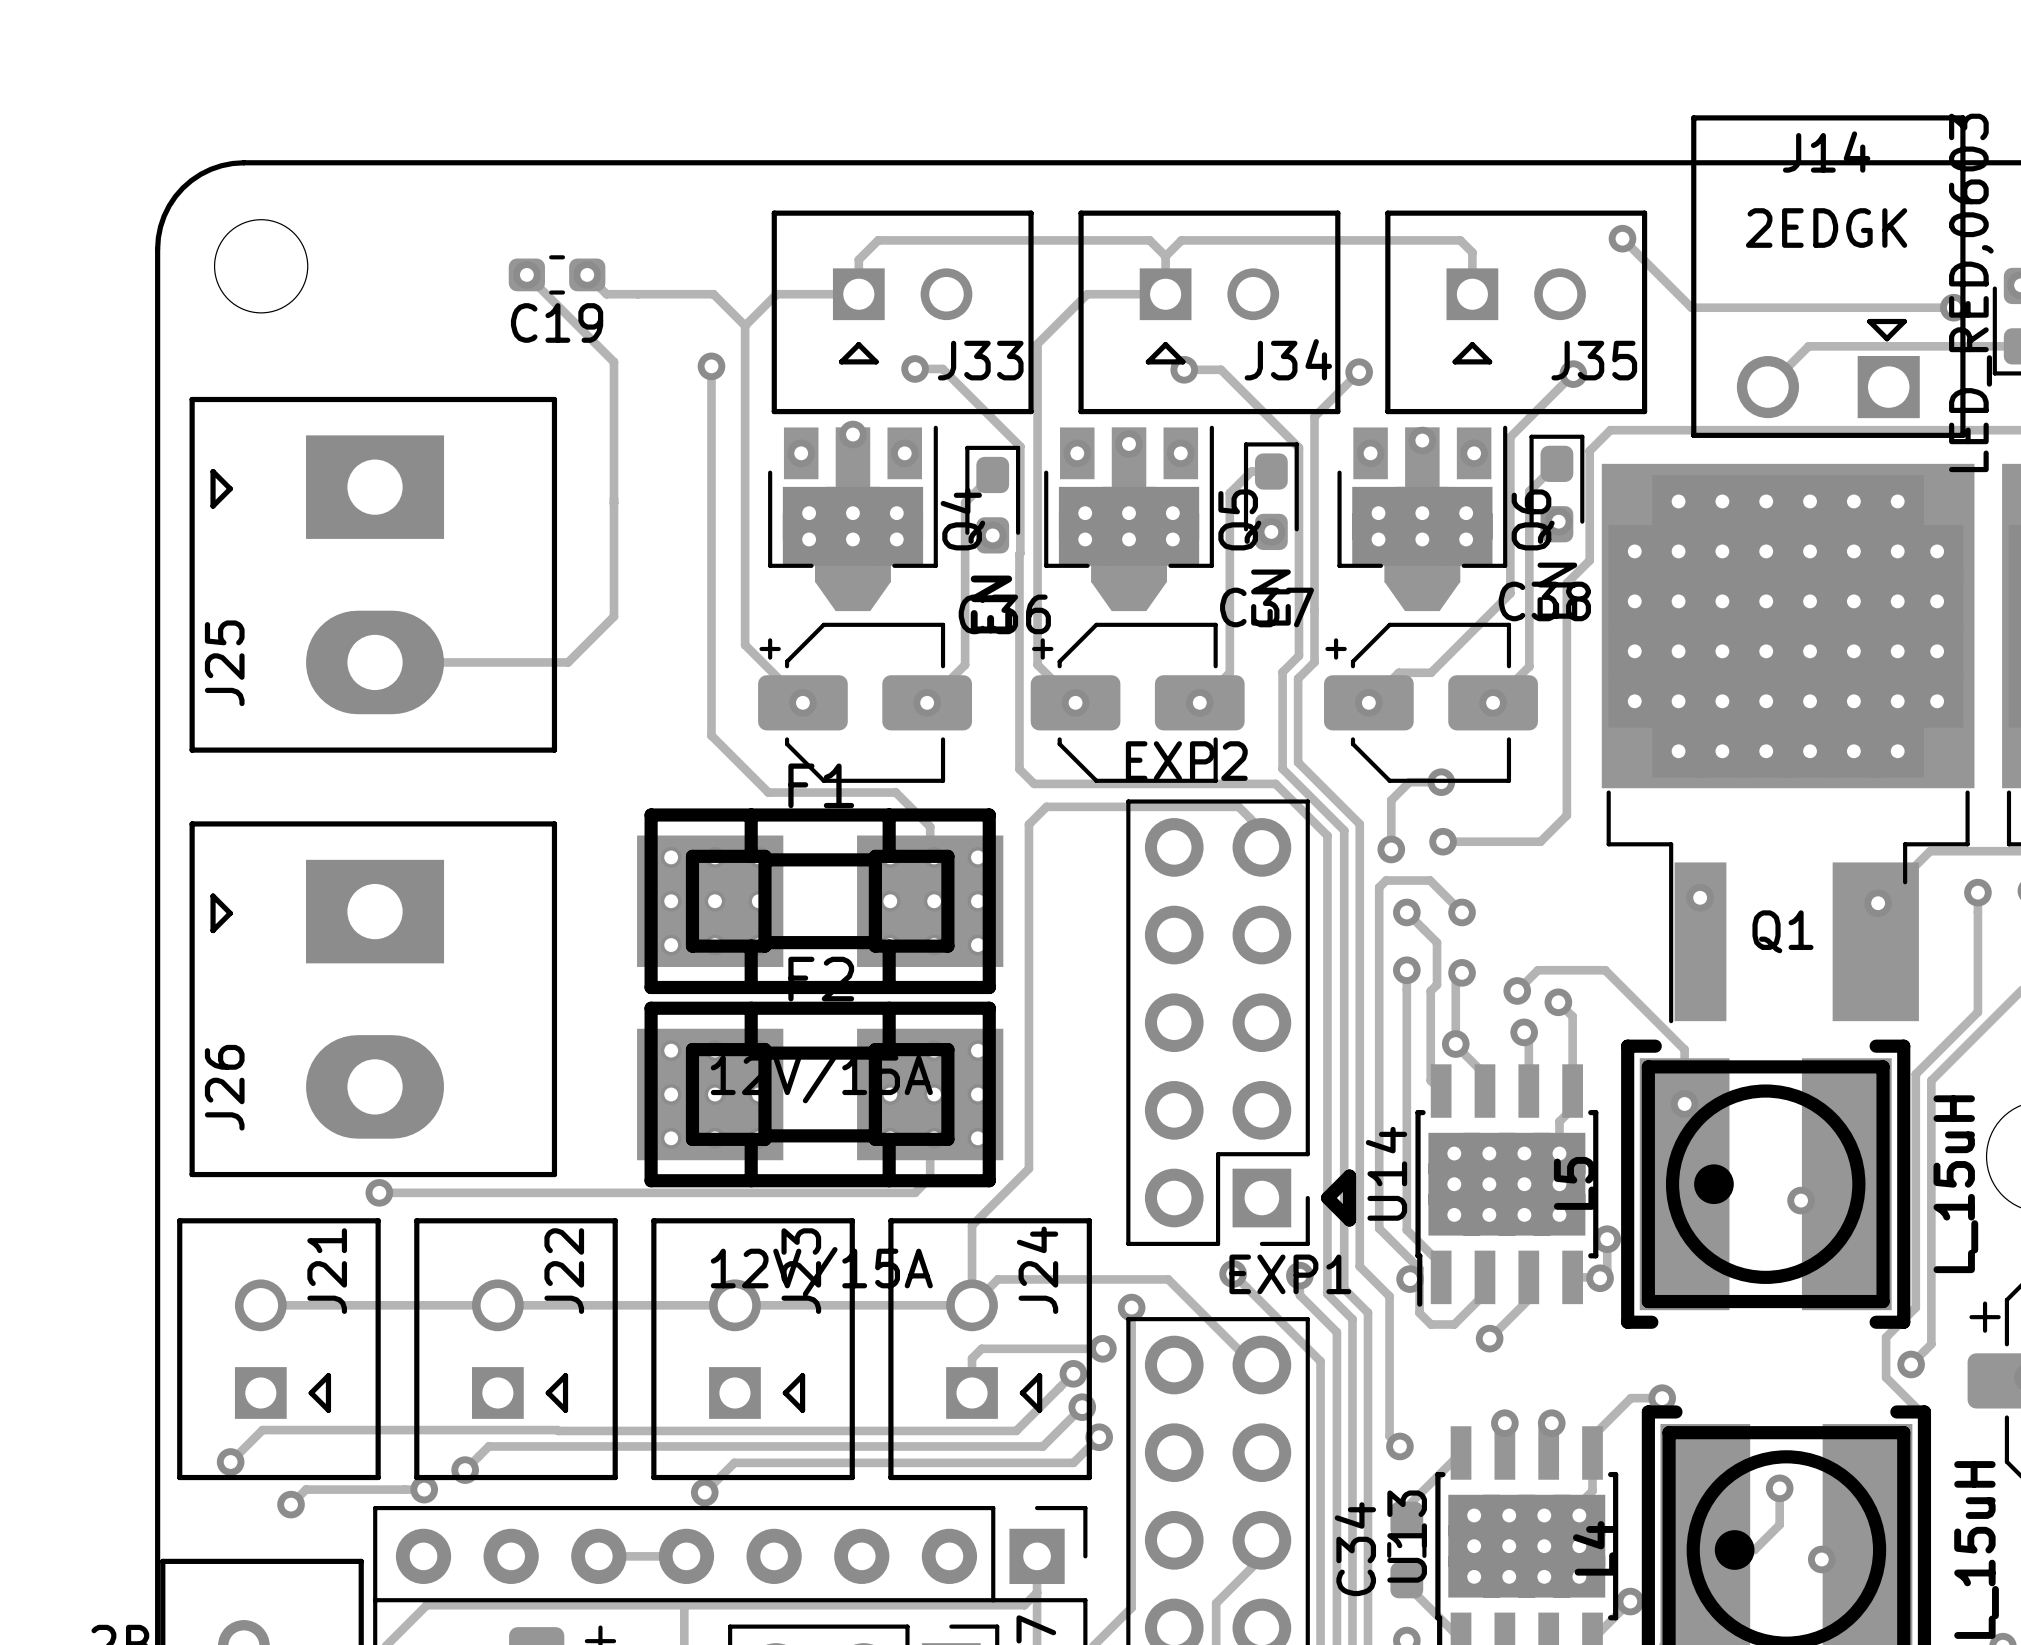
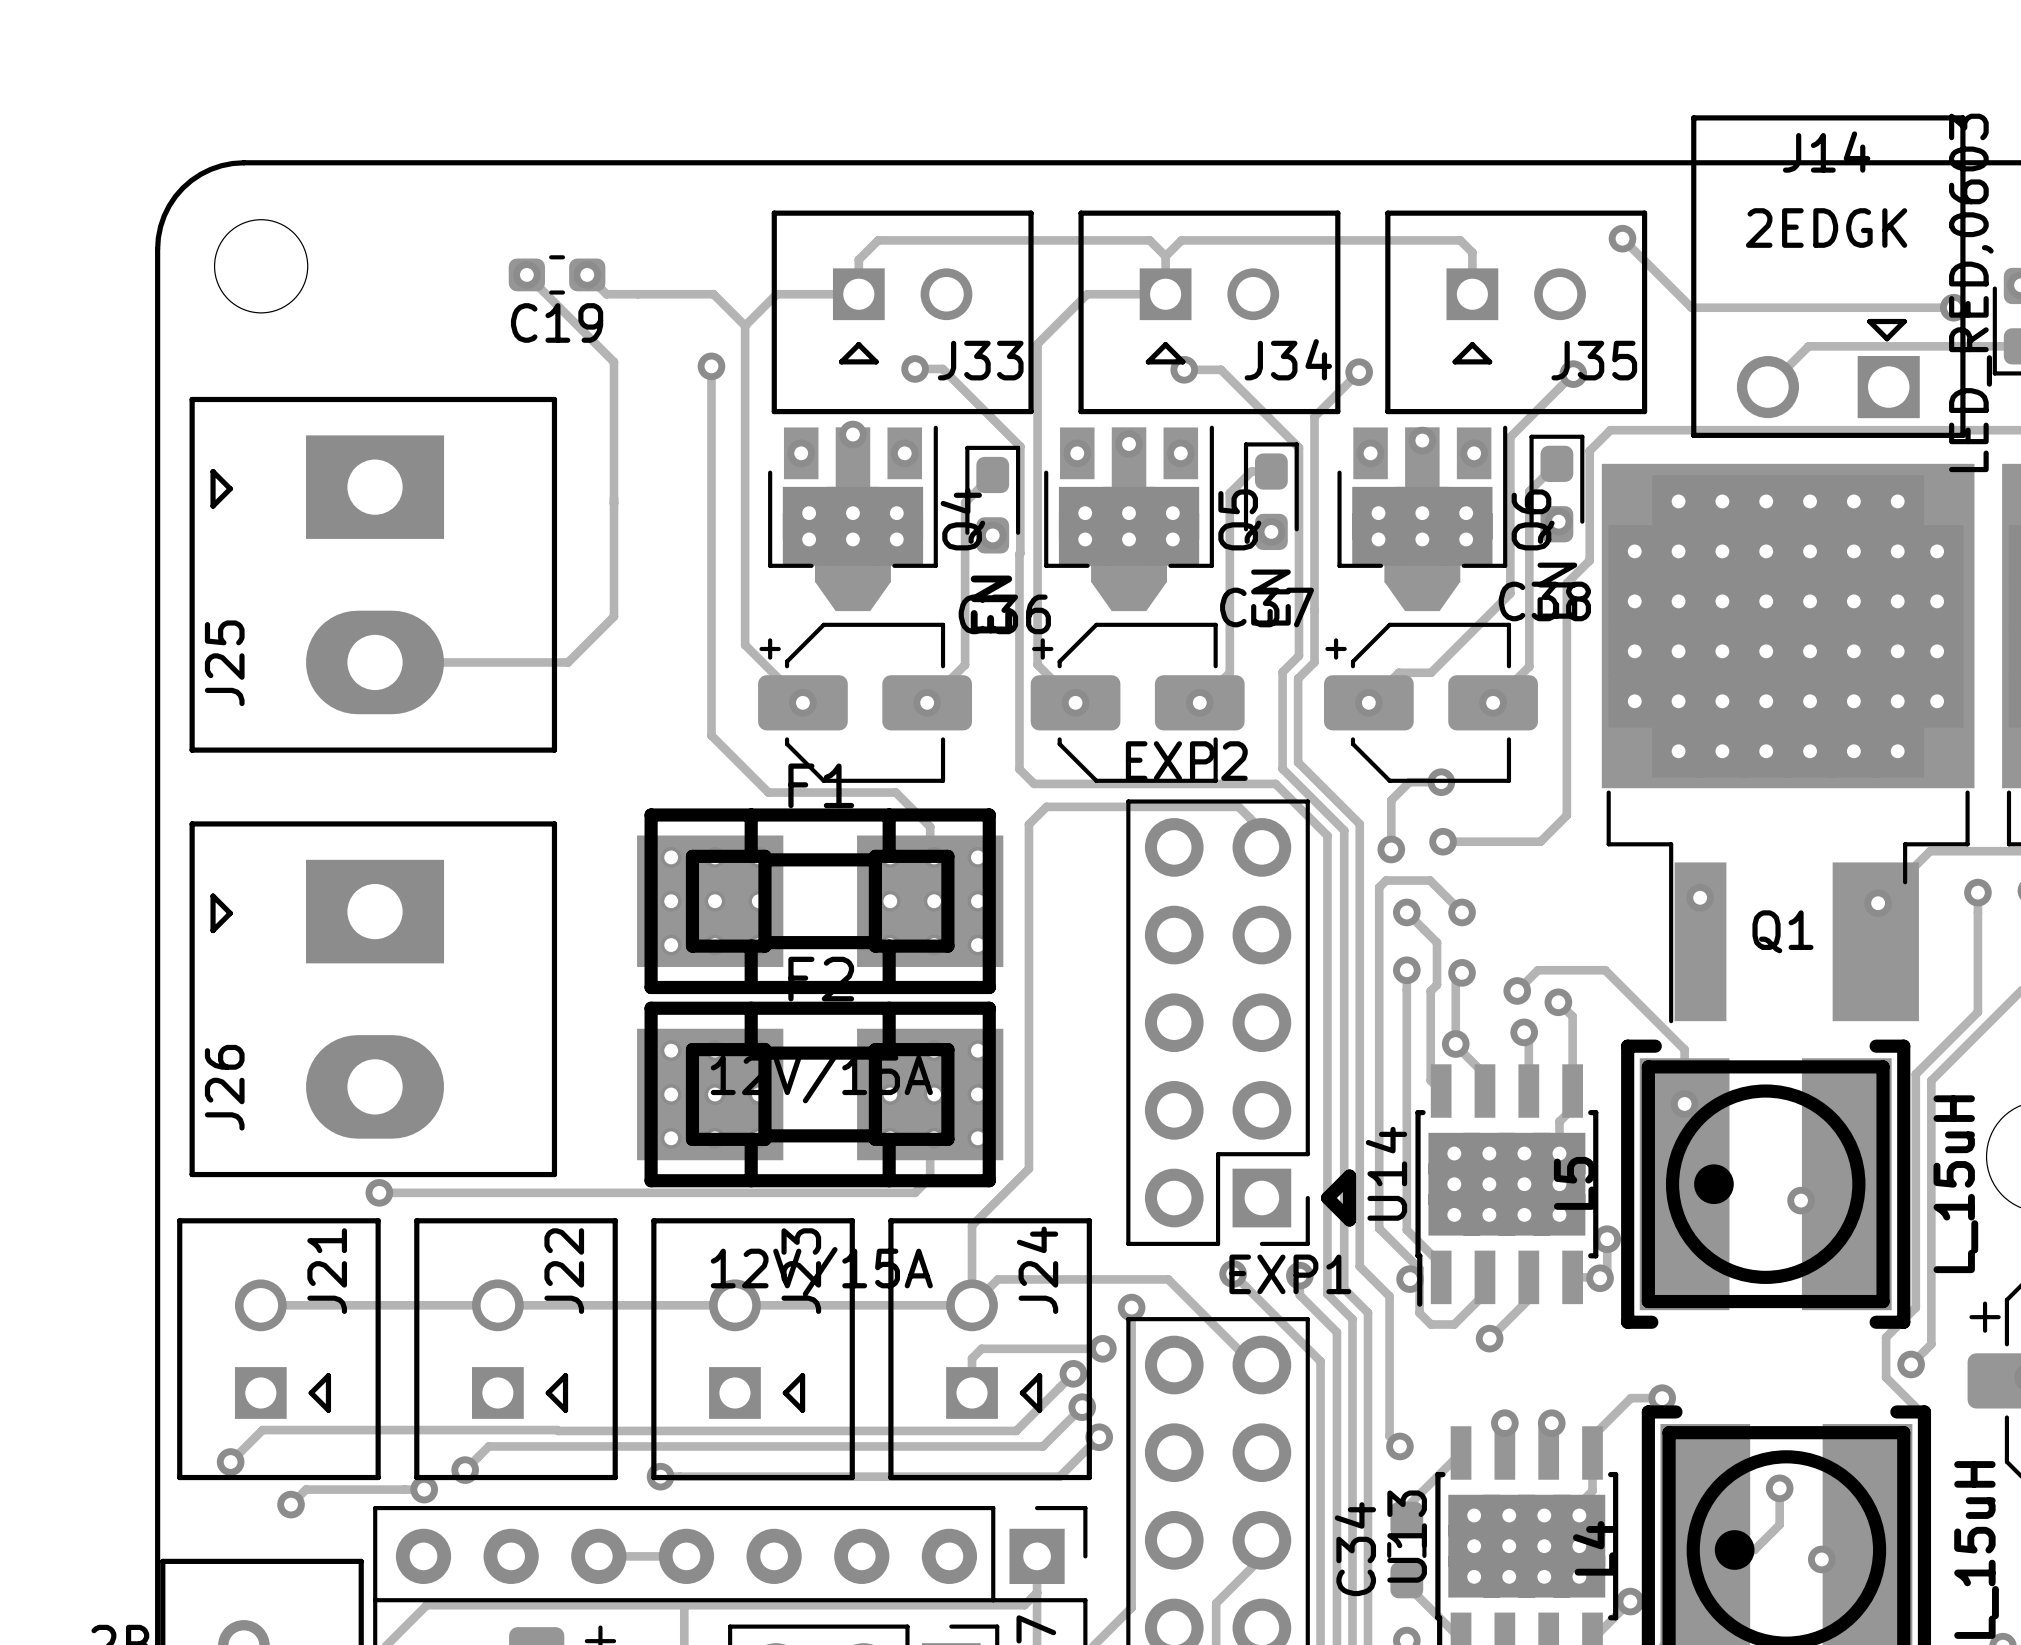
track: (1073, 1462) (734, 1462) (704, 1492) -> (1073, 1462) (1059, 1476) (660, 1476)
via position: (704, 1492) -> (660, 1476)

